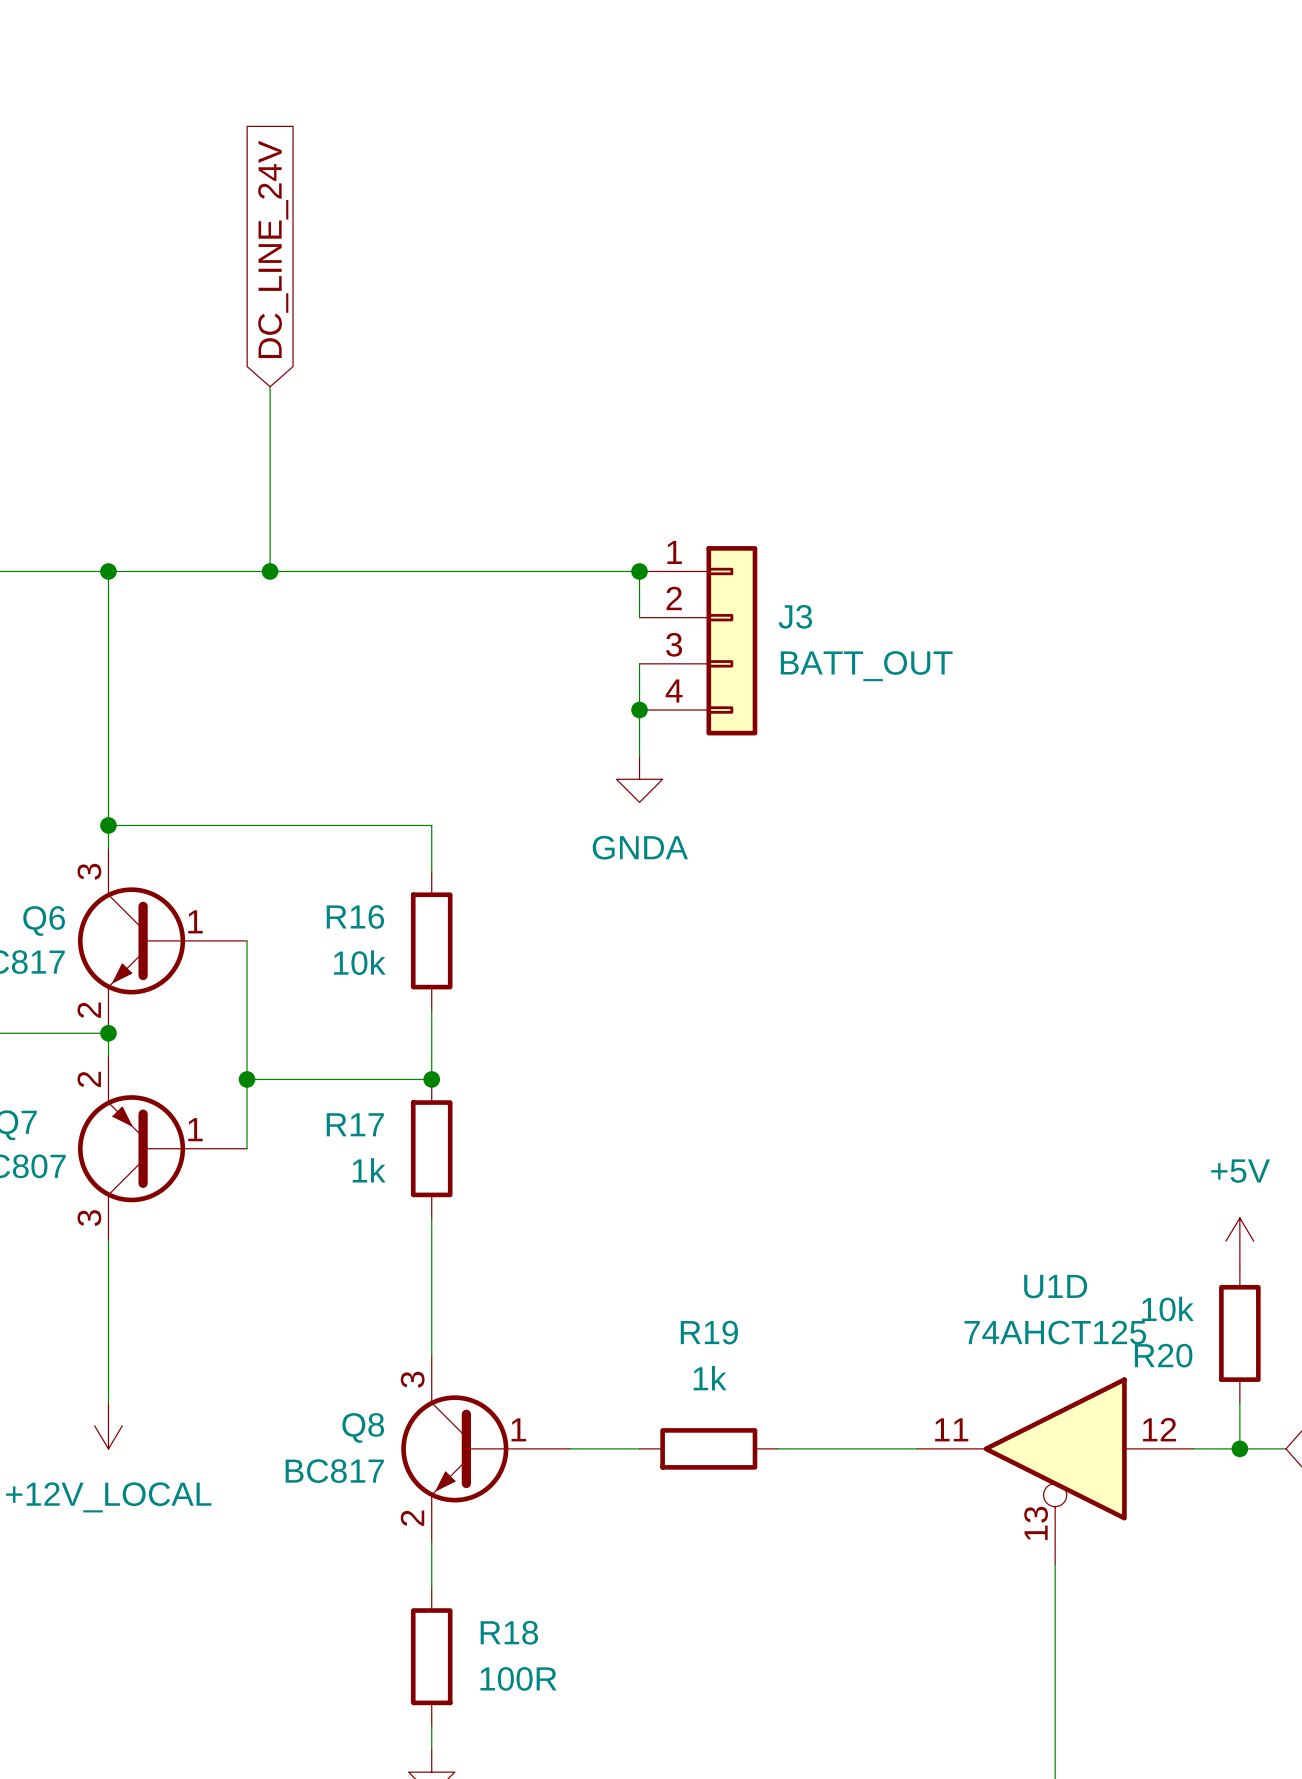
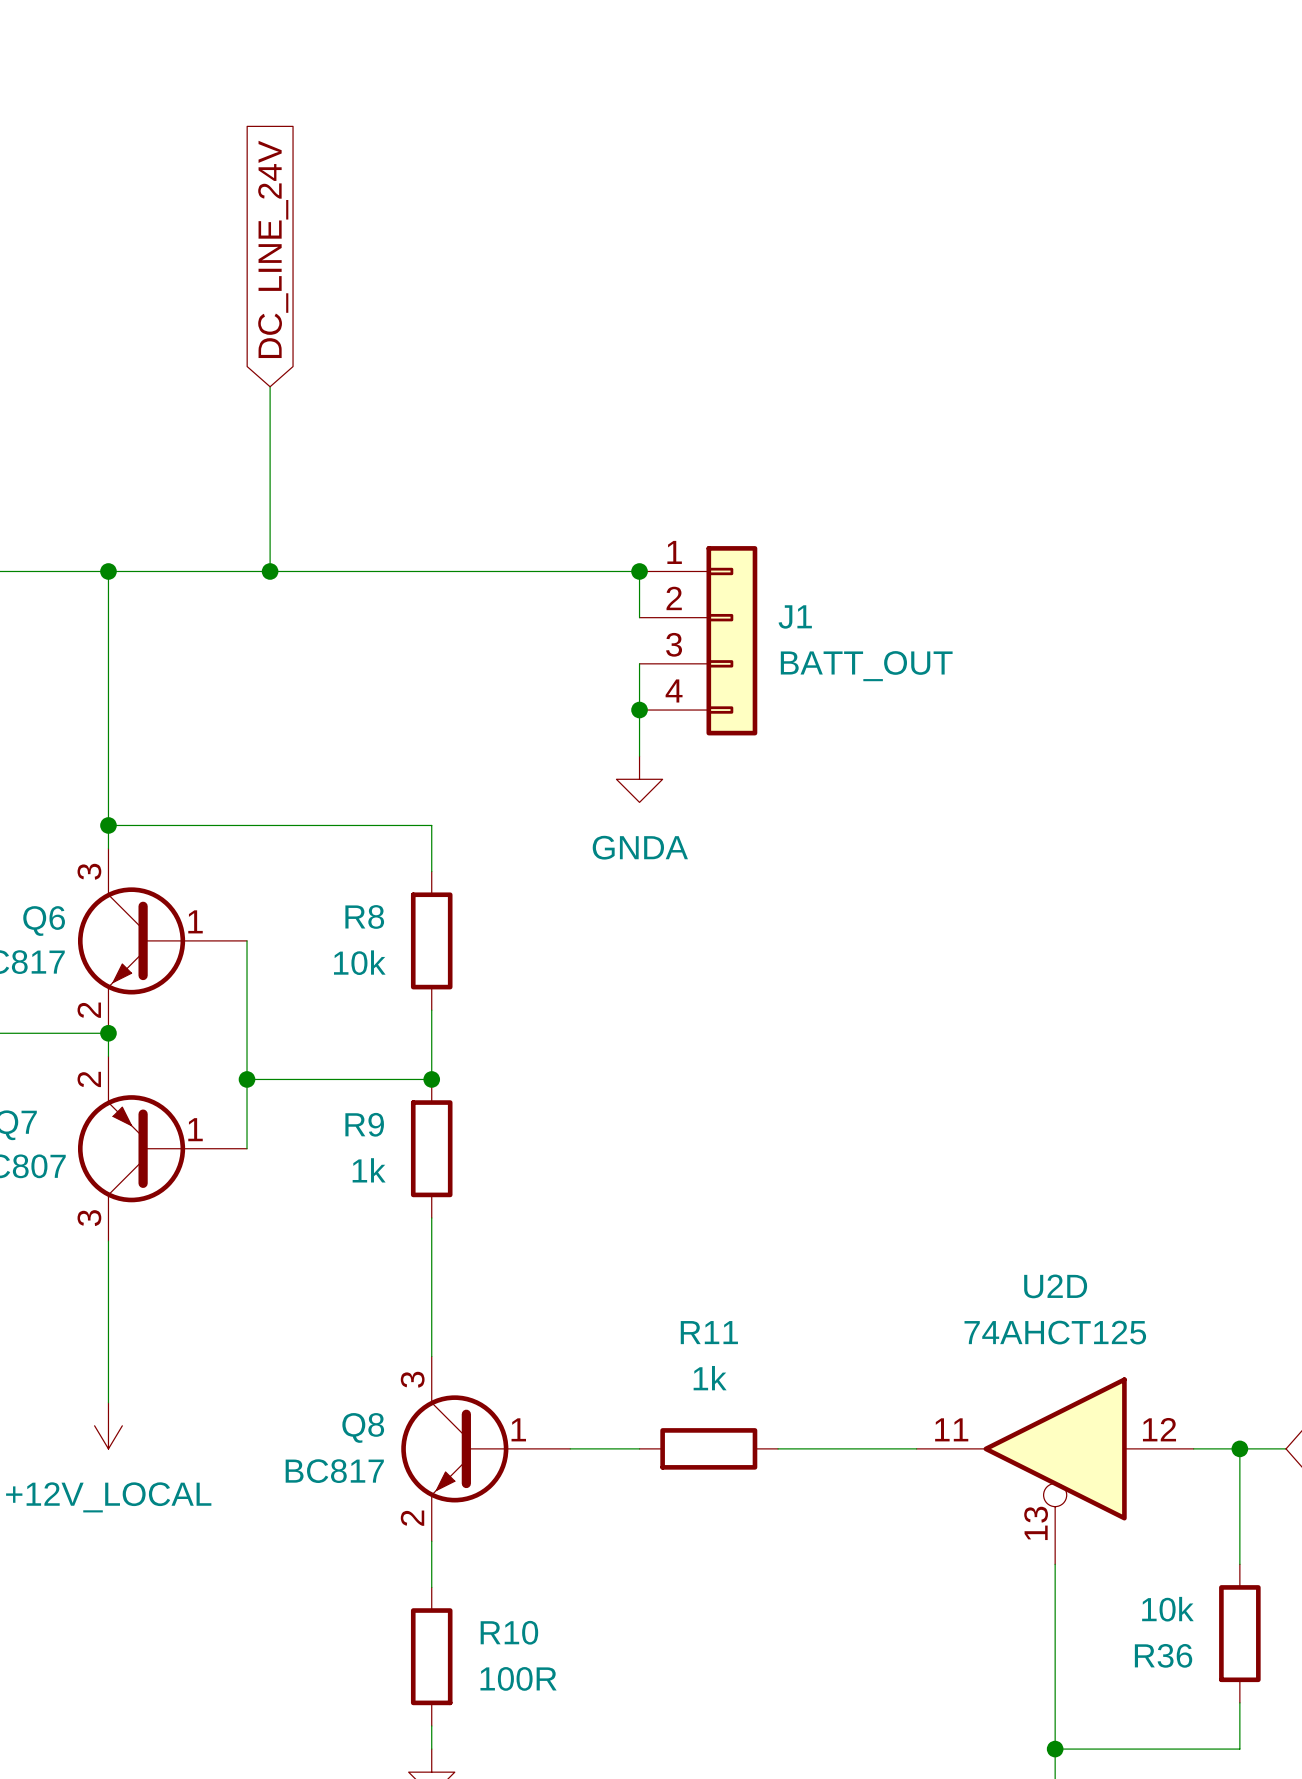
J3 name: J3 (795, 616) -> J1 (795, 616)
R16 name: R16 (355, 916) -> R8 (364, 916)
R17 name: R17 (355, 1124) -> R9 (364, 1124)
power symbol: +5V (1239, 1241) -> none
U1D name: U1D (1055, 1286) -> U2D (1055, 1286)
R19 name: R19 (709, 1332) -> R11 (709, 1332)
R20: 10k (1239, 1333) -> none
wire: (1239, 1402) (1239, 1448) -> (1239, 1564) (1239, 1448)
R18 name: R18 (509, 1632) -> R10 (509, 1632)
R36: none -> 10k (1239, 1633)
wire: none -> (1239, 1702) (1239, 1749) (1055, 1749)
junction: none -> (1055, 1749)

